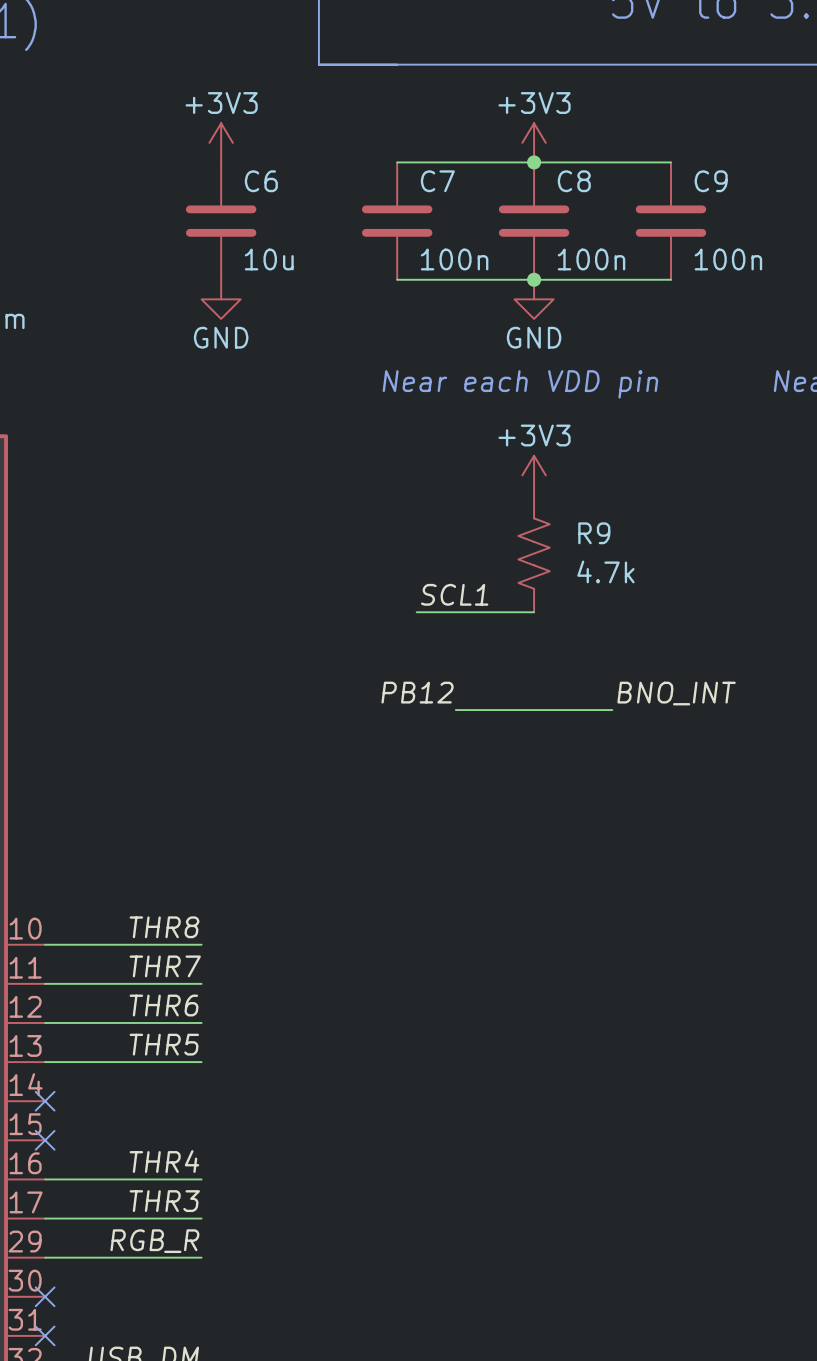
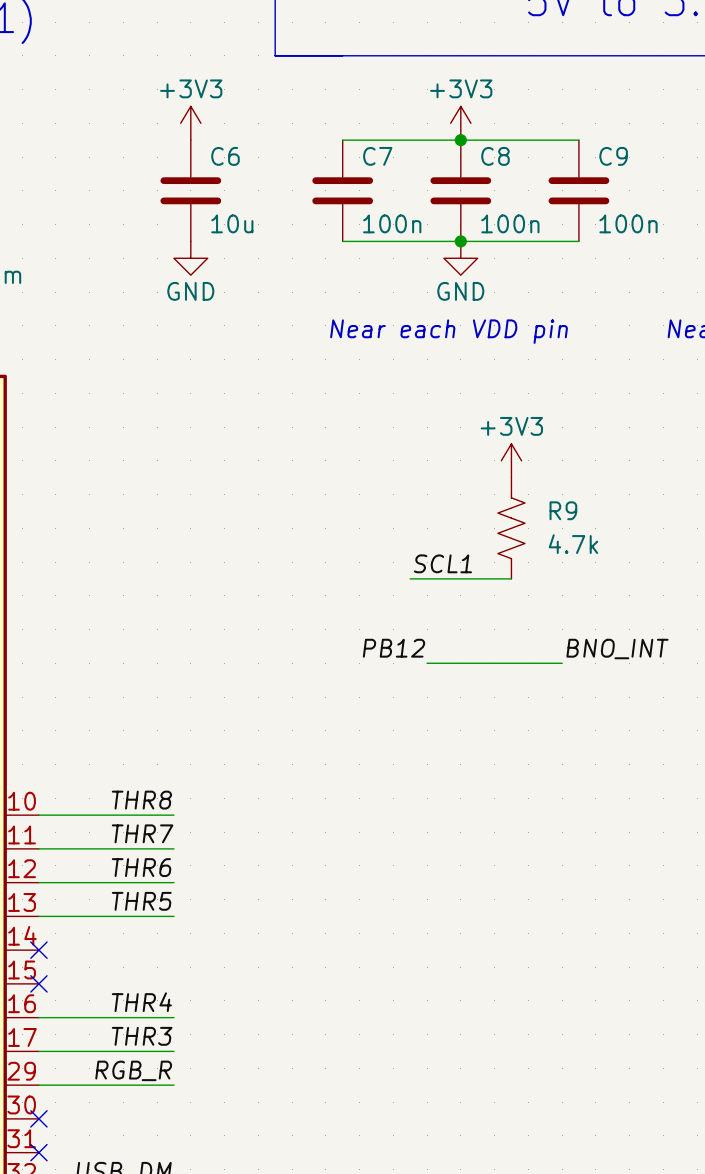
power symbol position: +3V3 (534, 475) -> +3V3 (511, 460)
R9 position: (534, 553) -> (511, 528)
label position: SCL1 (454, 594) -> SCL1 (442, 563)
wire: (416, 612) (534, 612) -> (410, 578) (511, 578)
label position: PB12 (417, 692) -> PB12 (394, 648)
label position: BNO_INT (676, 693) -> BNO_INT (617, 649)
wire: (455, 710) (612, 710) -> (427, 663) (562, 663)

